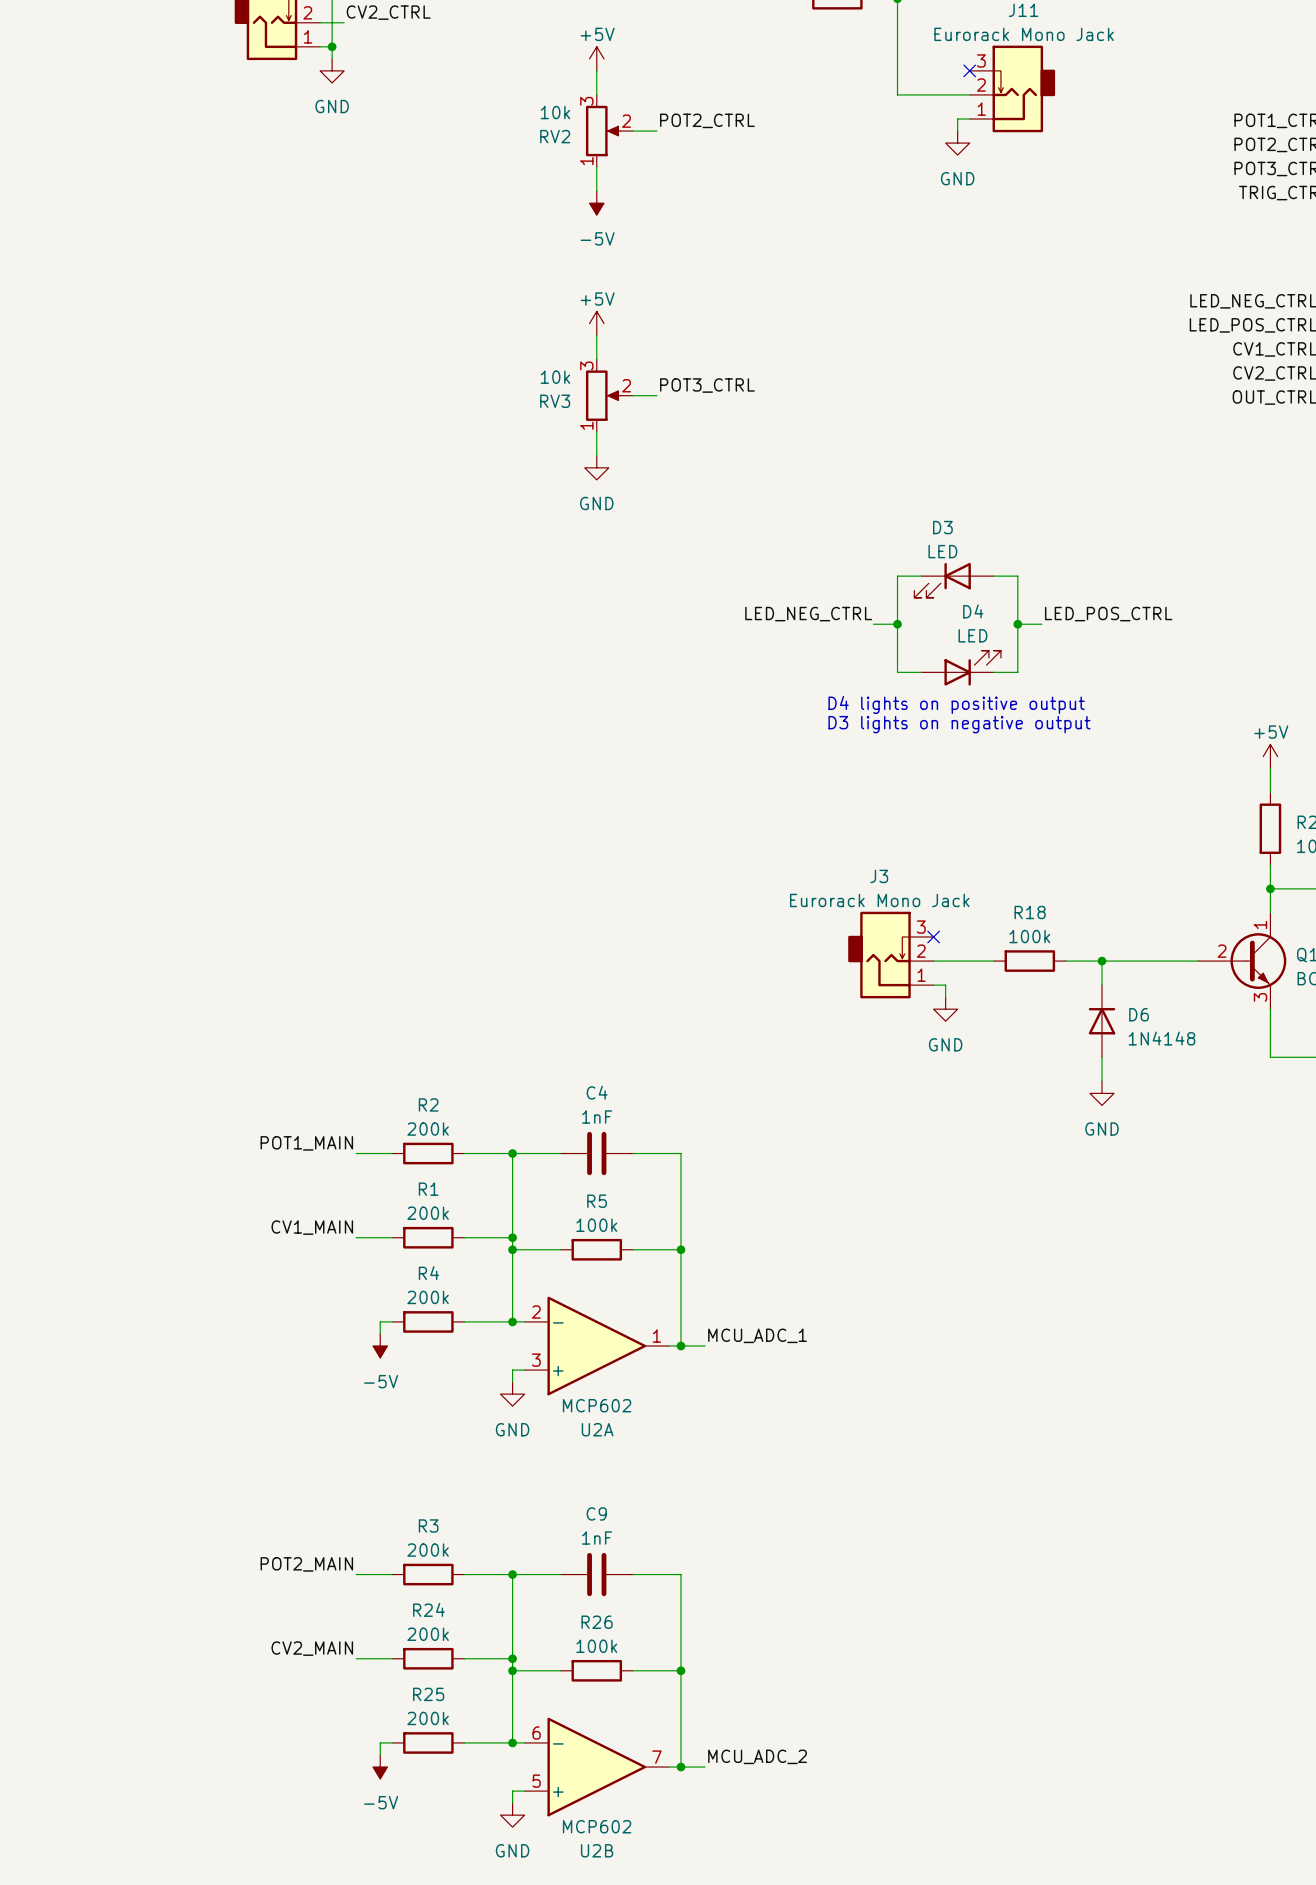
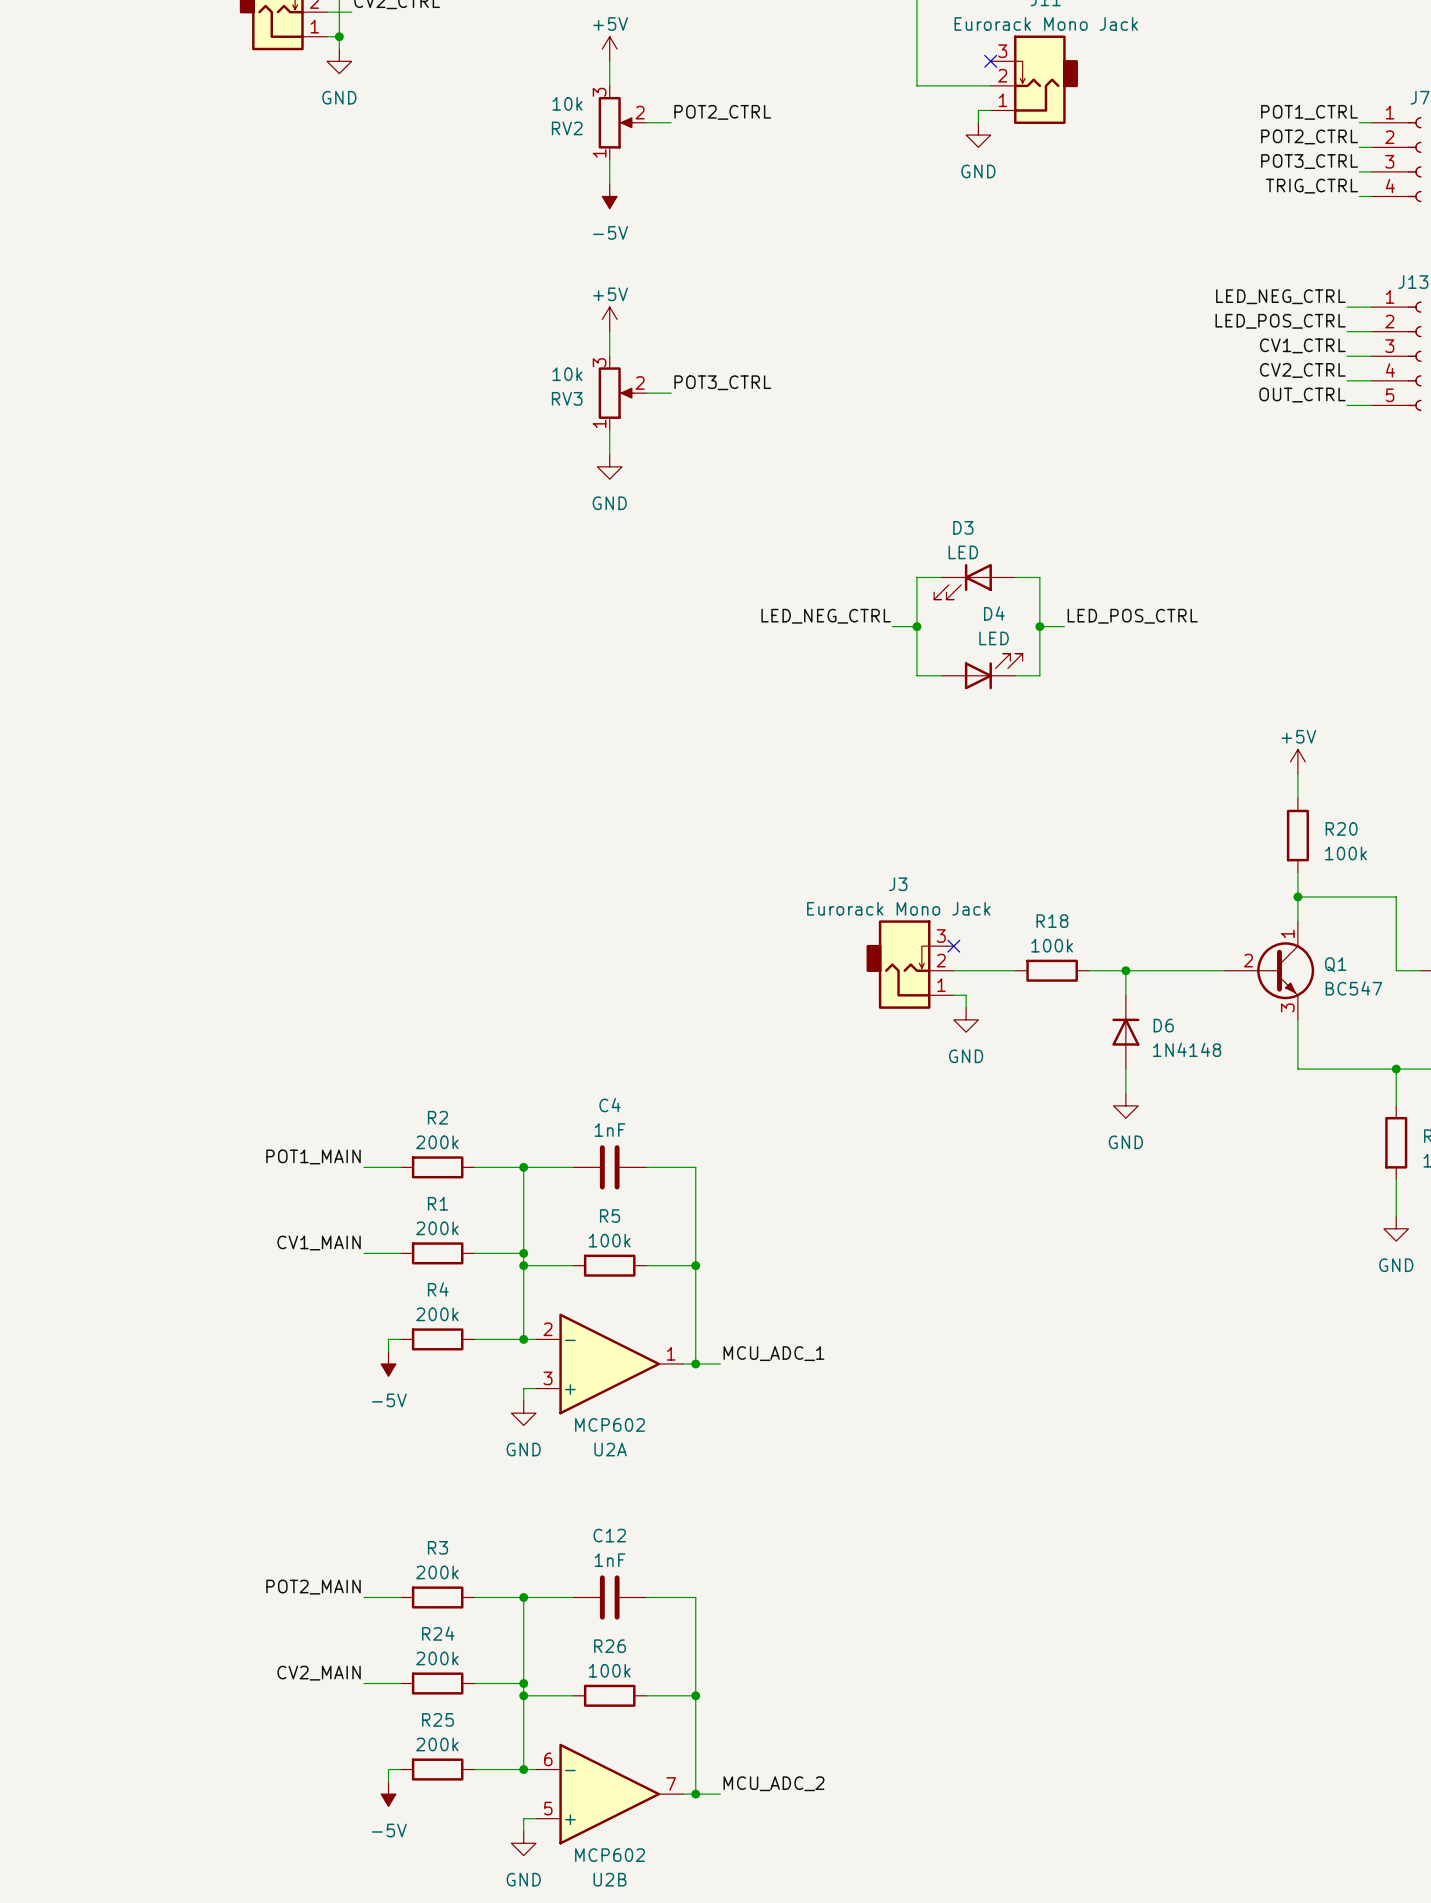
text: D4 lights on positive output (956, 705) -> none
text: D3 lights on negative output (959, 724) -> none
C9 name: C9 (596, 1513) -> C12 (609, 1535)

